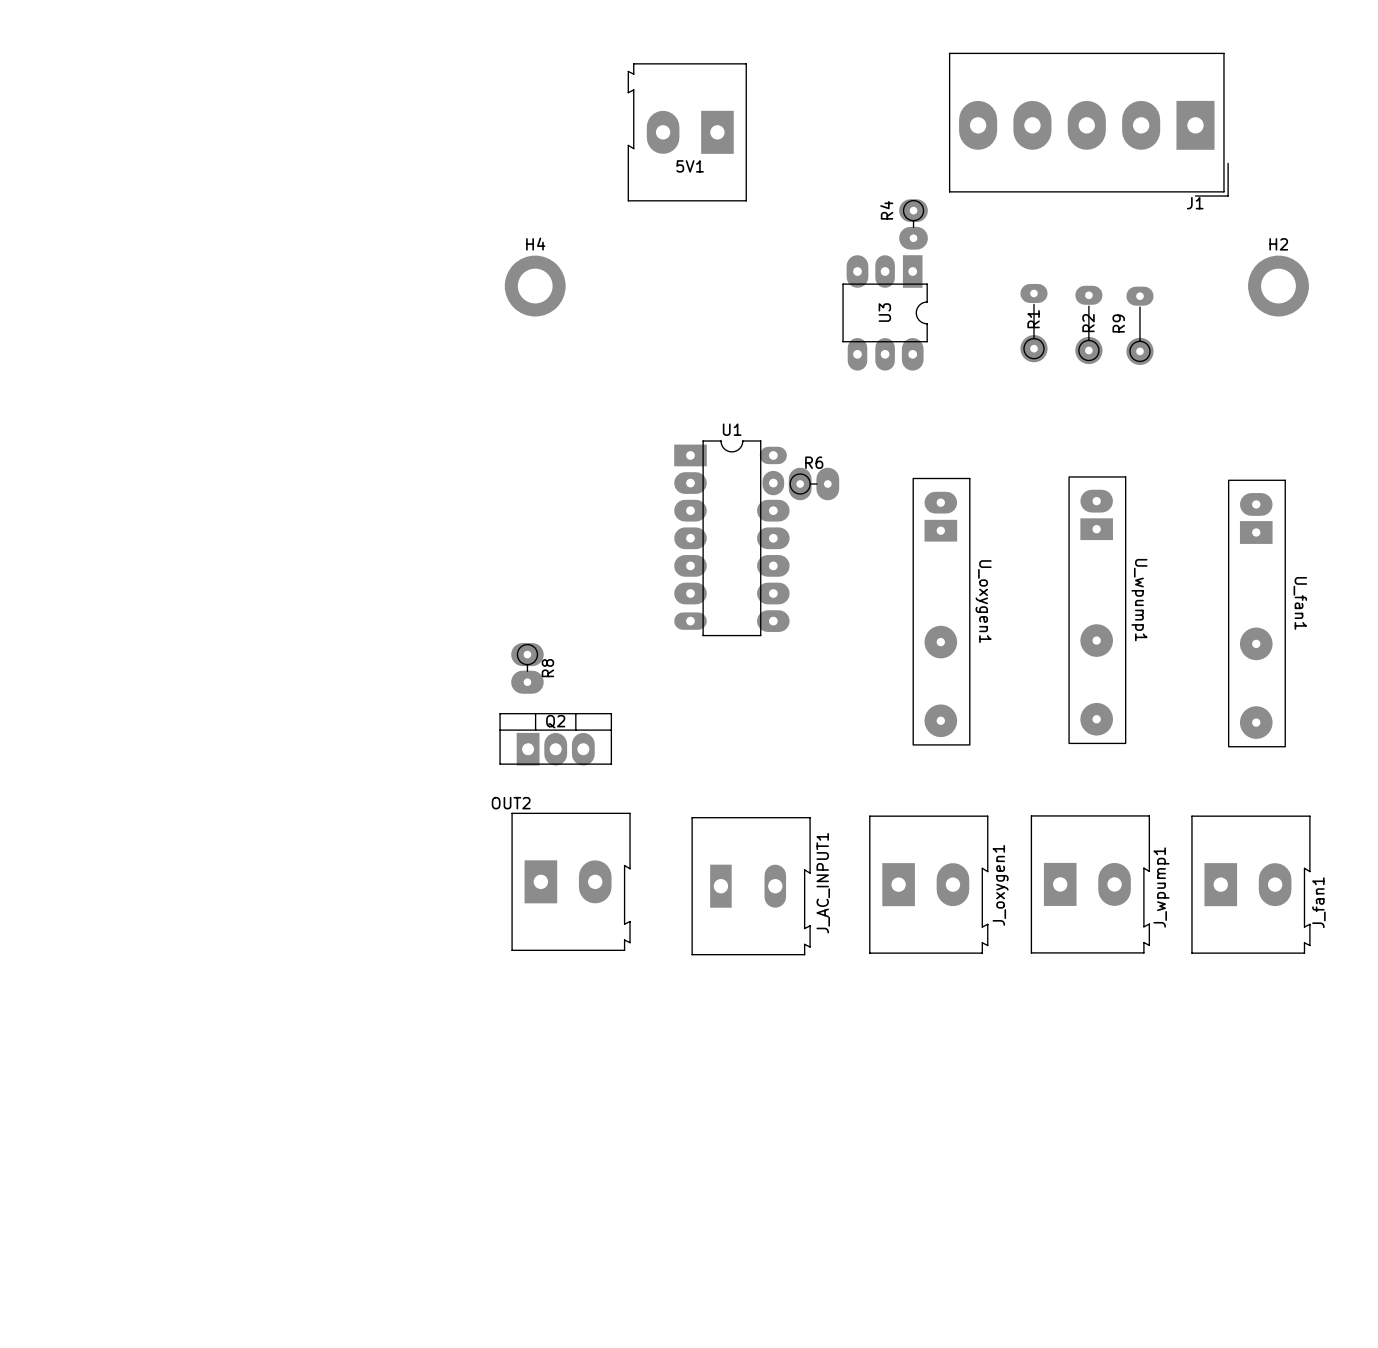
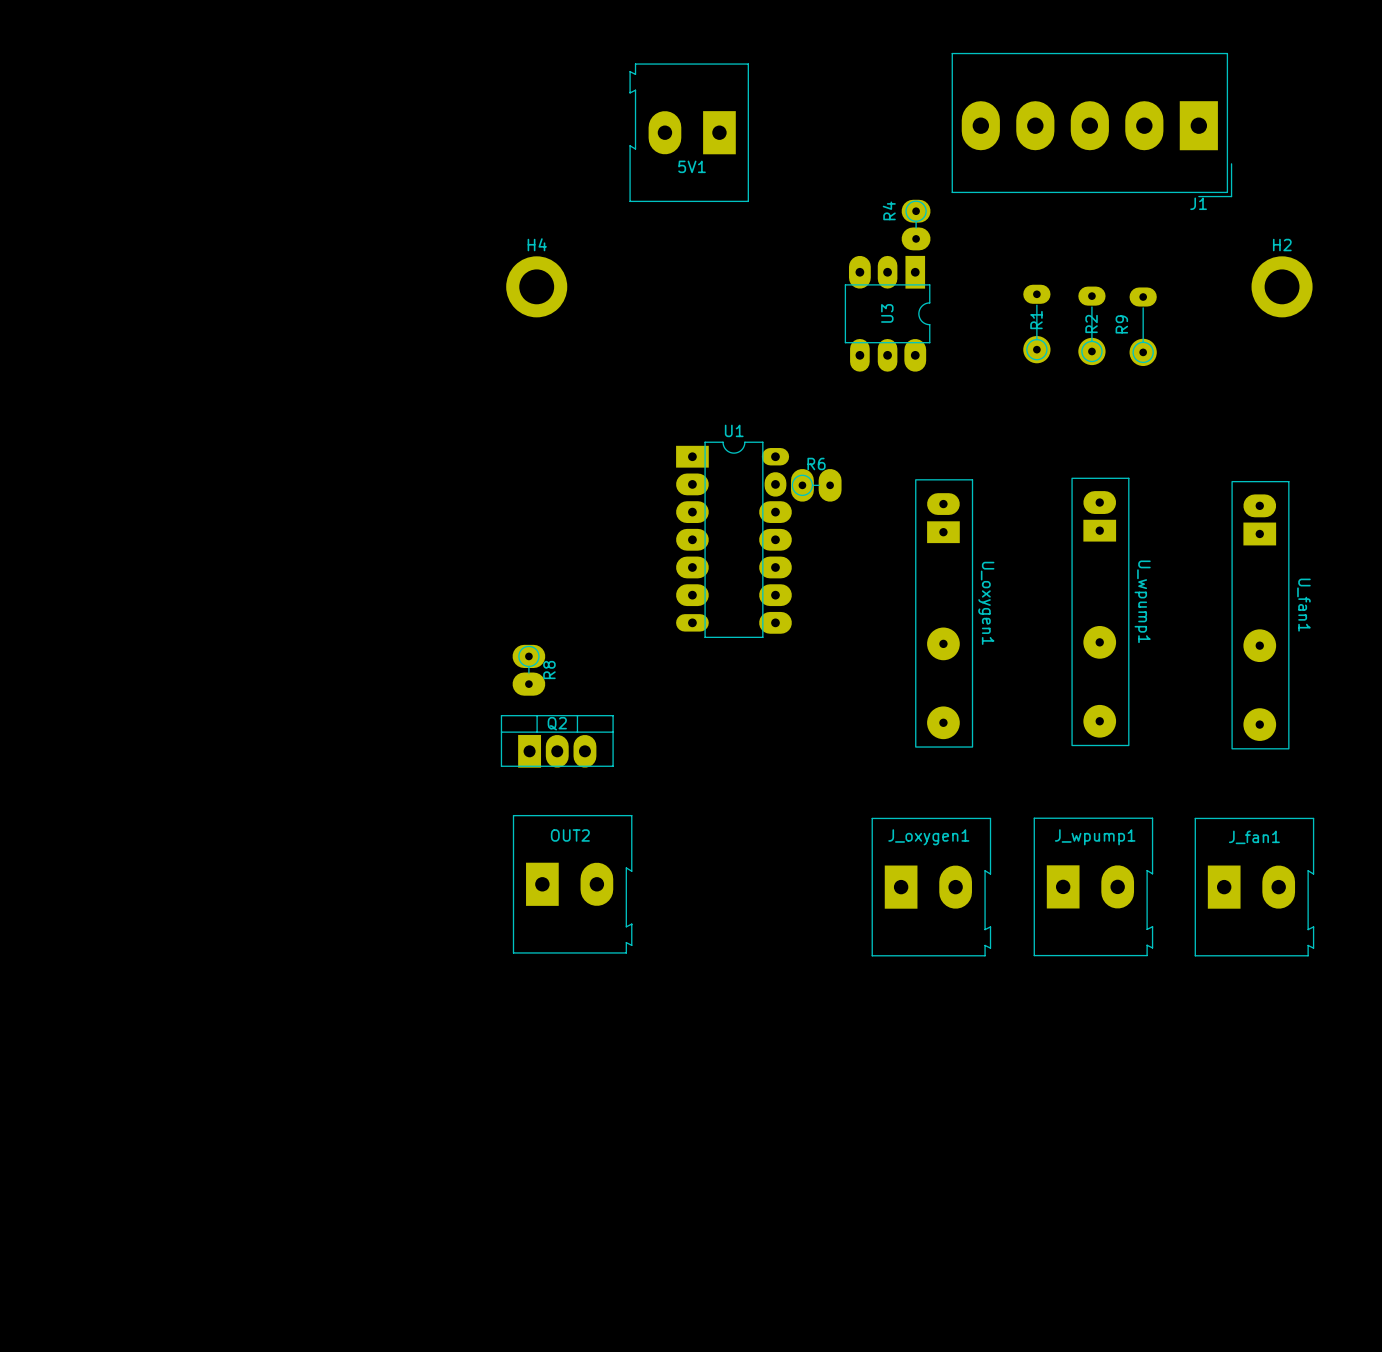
OUT2 name position: OUT2 (511, 803) -> OUT2 (570, 835)
J_oxygen1 name rotation: 0° (1000, 885) -> 90° clockwise (928, 837)
J_AC_INPUT1: (751, 886) -> none
J_wpump1 name rotation: 0° (1161, 887) -> 90° clockwise (1095, 837)
J_fan1 name rotation: 0° (1318, 902) -> 90° clockwise (1254, 837)
J_fan1 name position: J_fan1 (1318, 902) -> J_fan1 (1254, 837)

